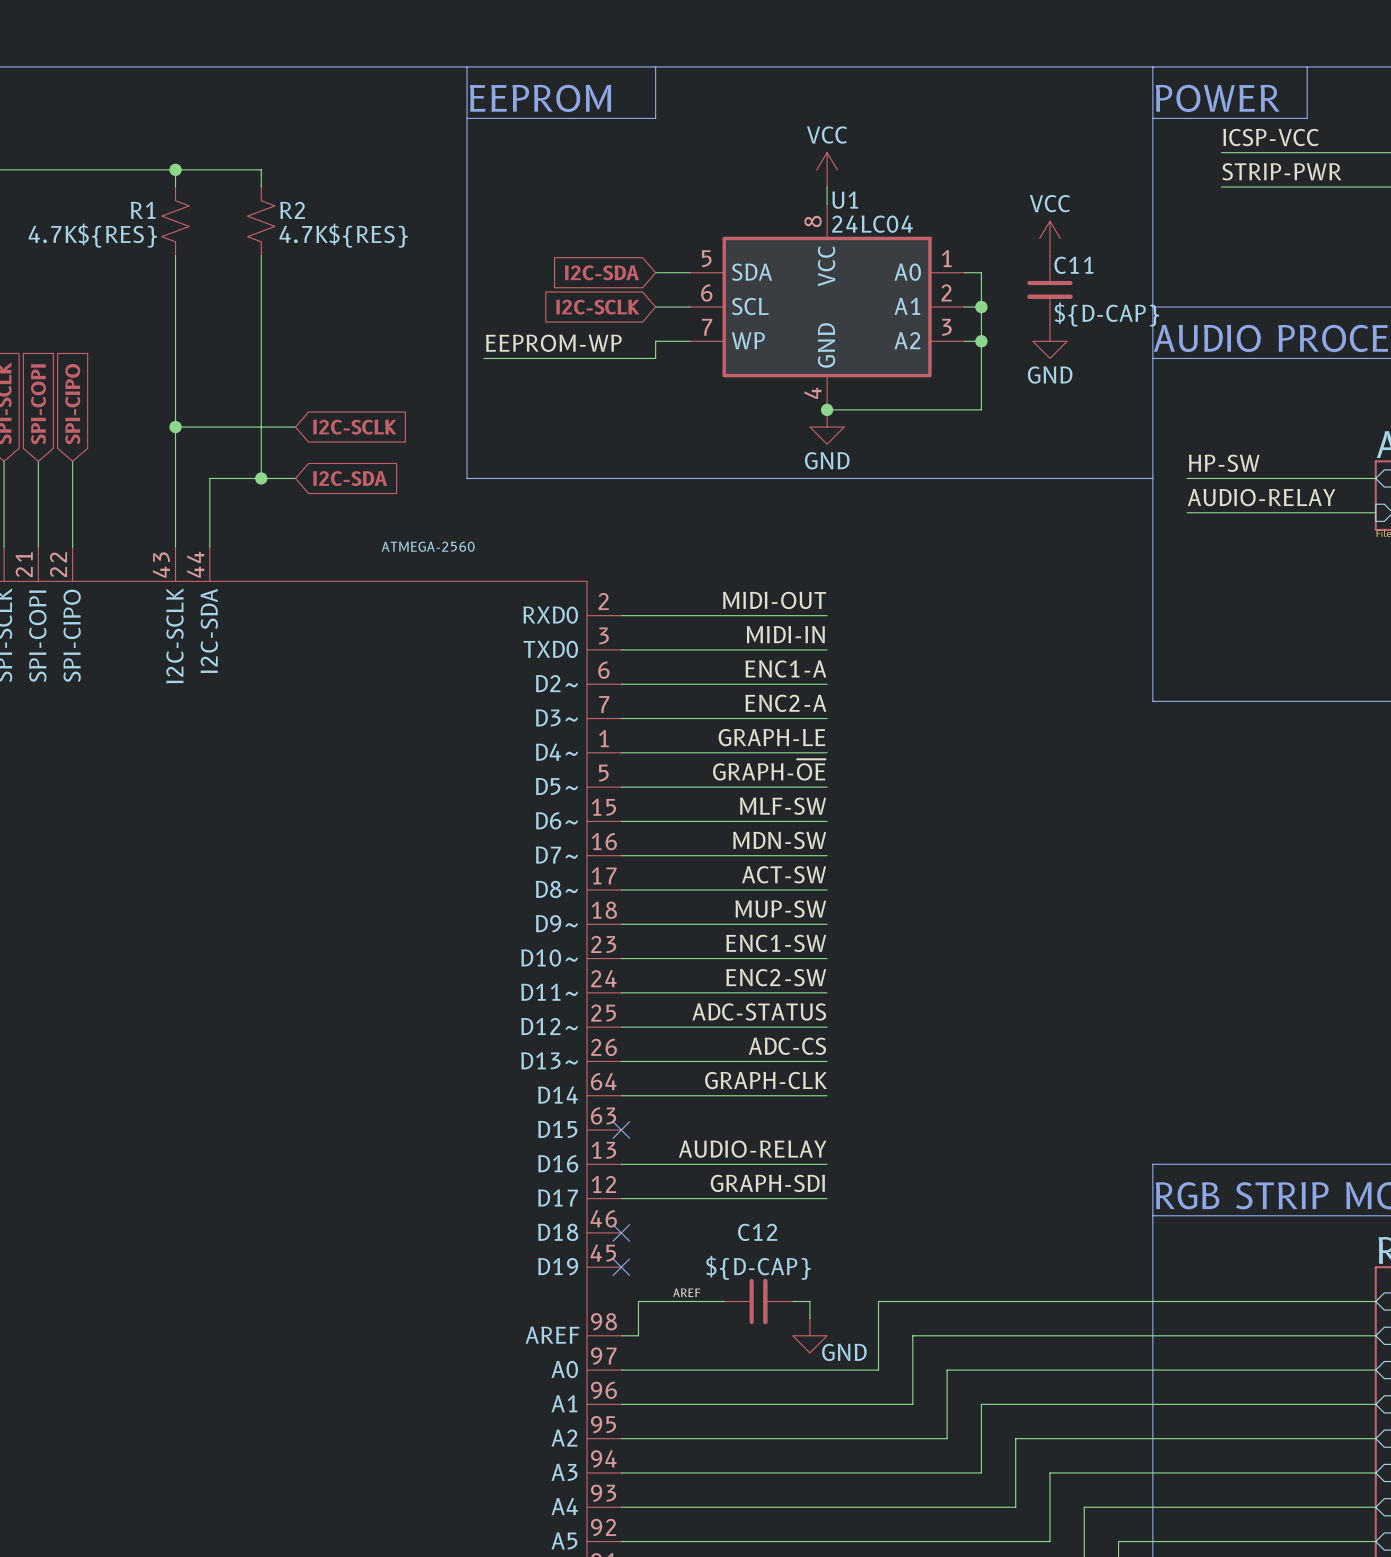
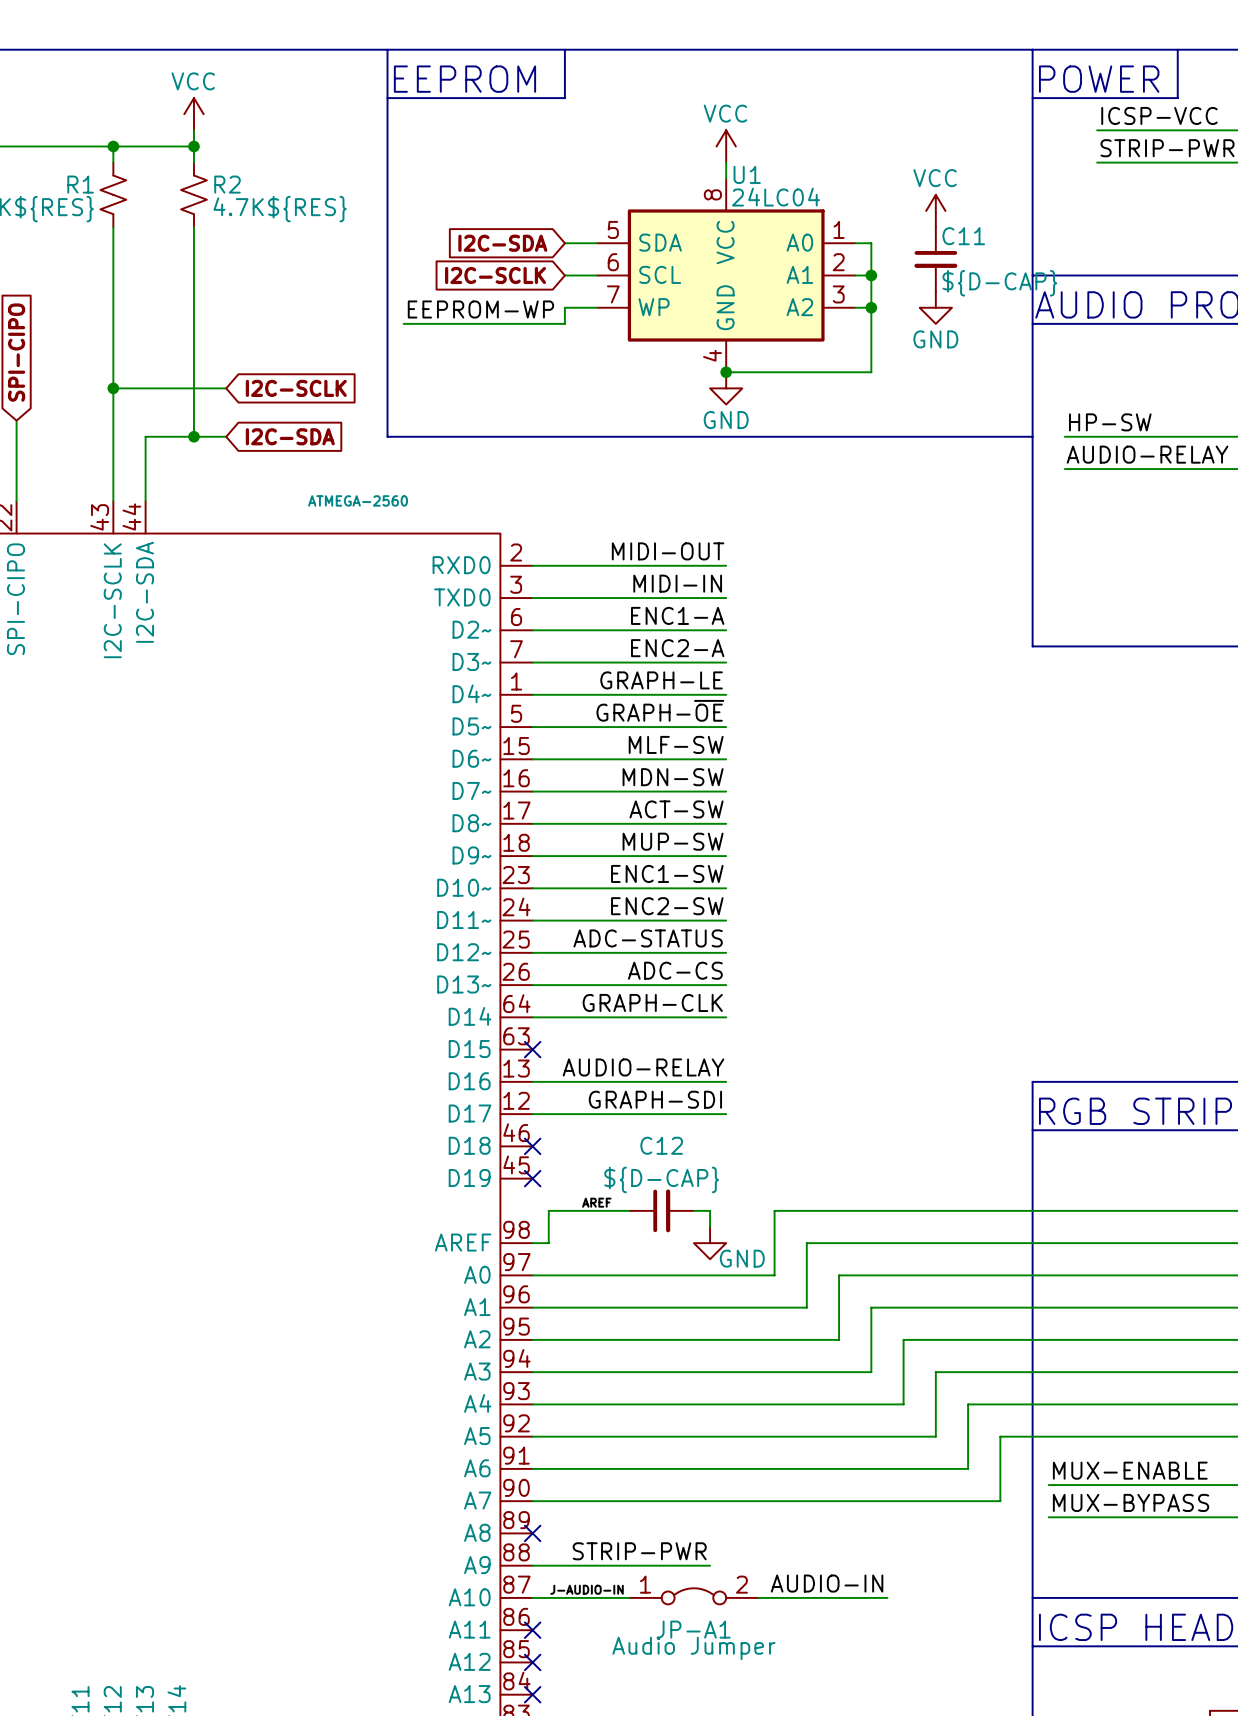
power symbol: none -> VCC (193, 114)
wire: none -> (193, 130) (193, 146)
junction: none -> (193, 146)

